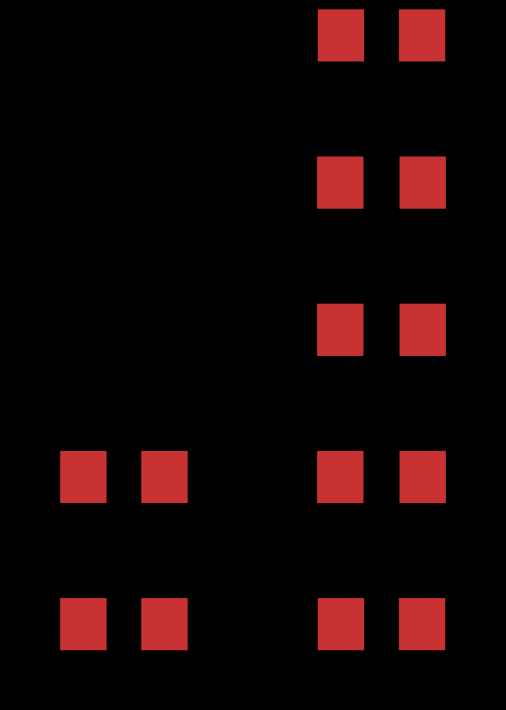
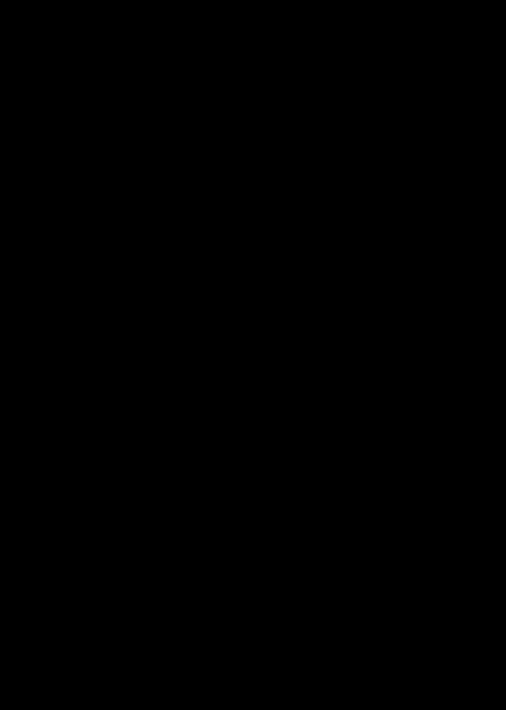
part: (381, 35) -> none
part: (381, 182) -> none
part: (381, 329) -> none
part: (123, 476) -> none
part: (381, 476) -> none
part: (123, 624) -> none
part: (381, 624) -> none

